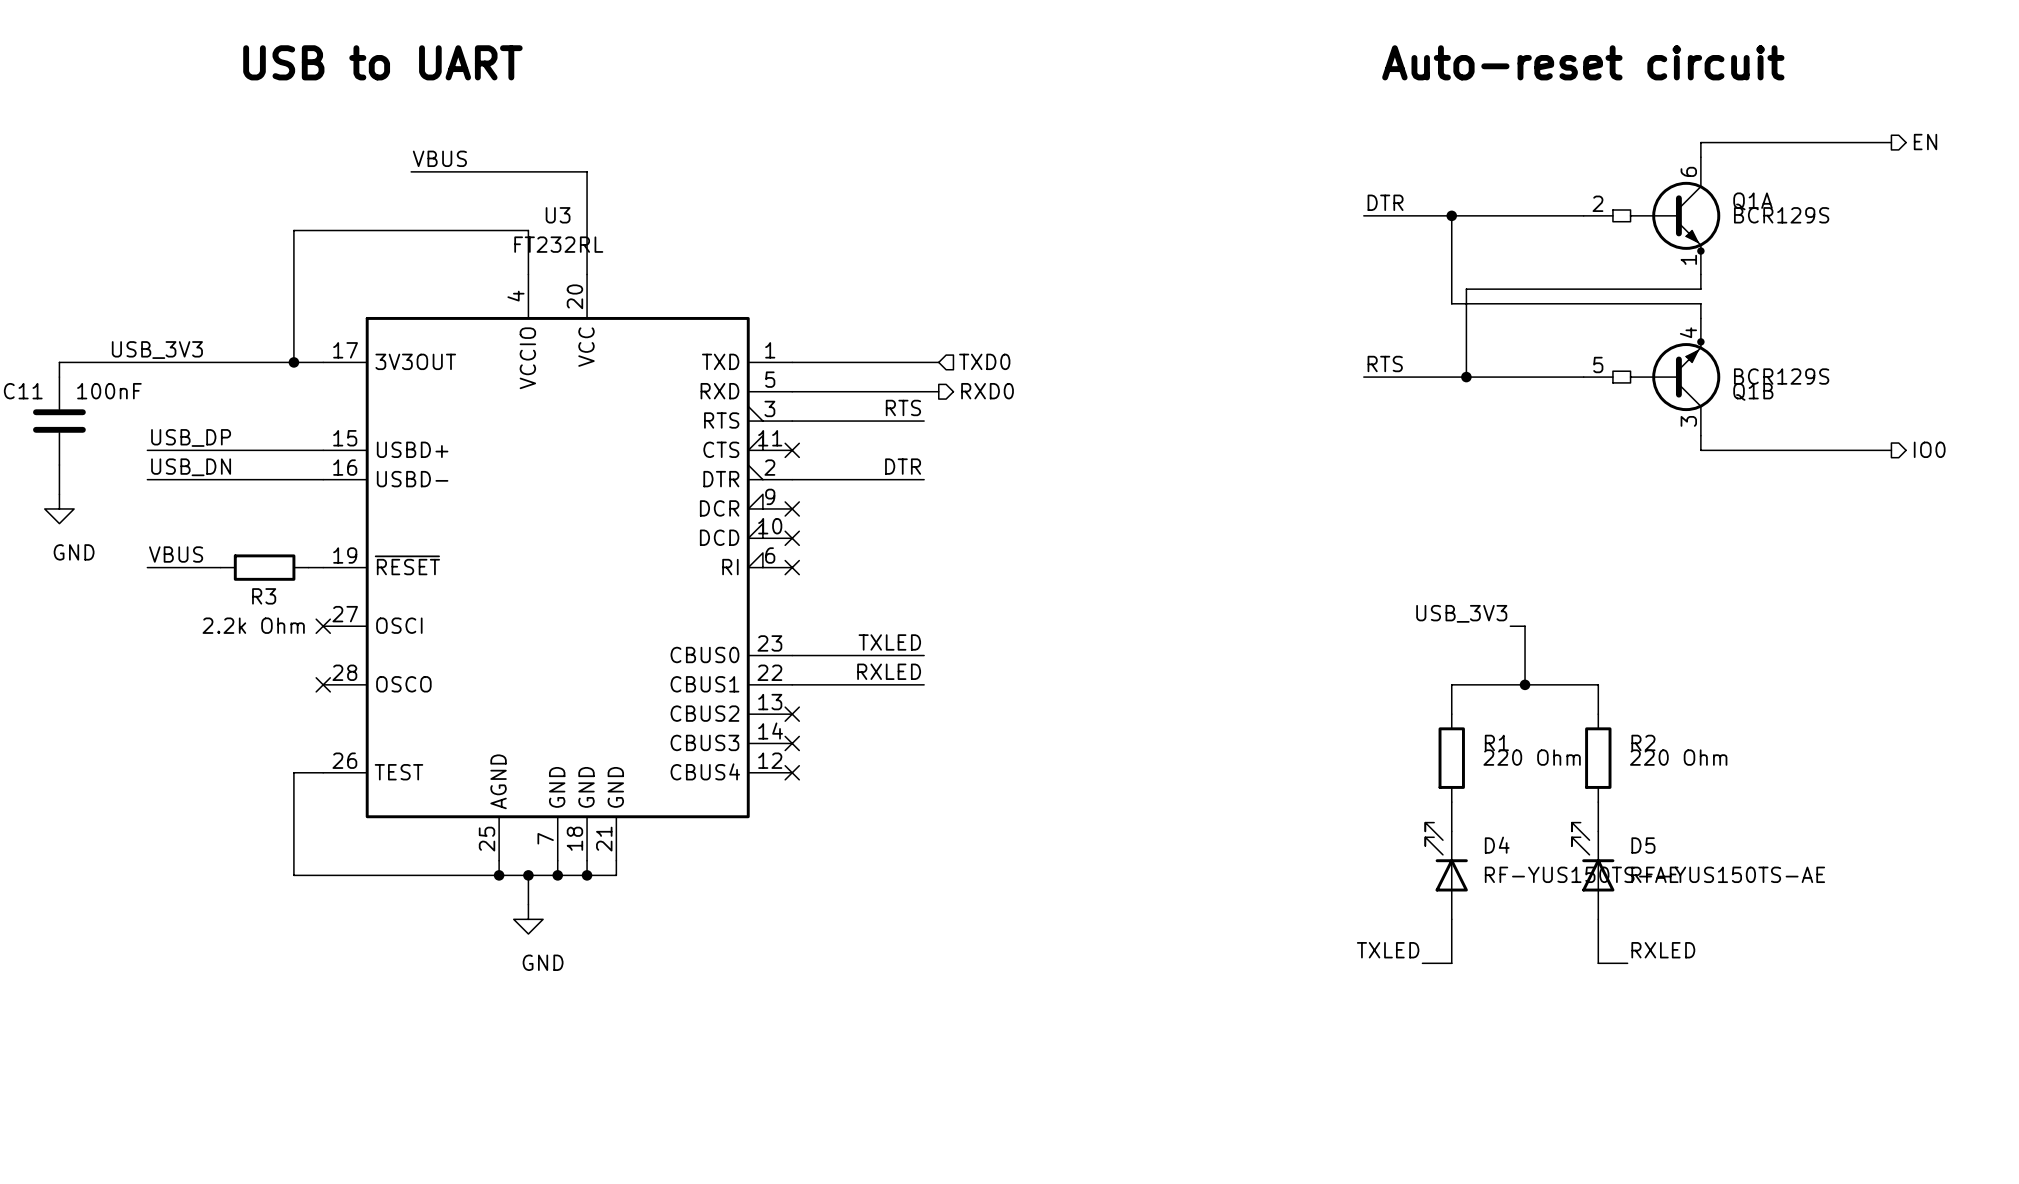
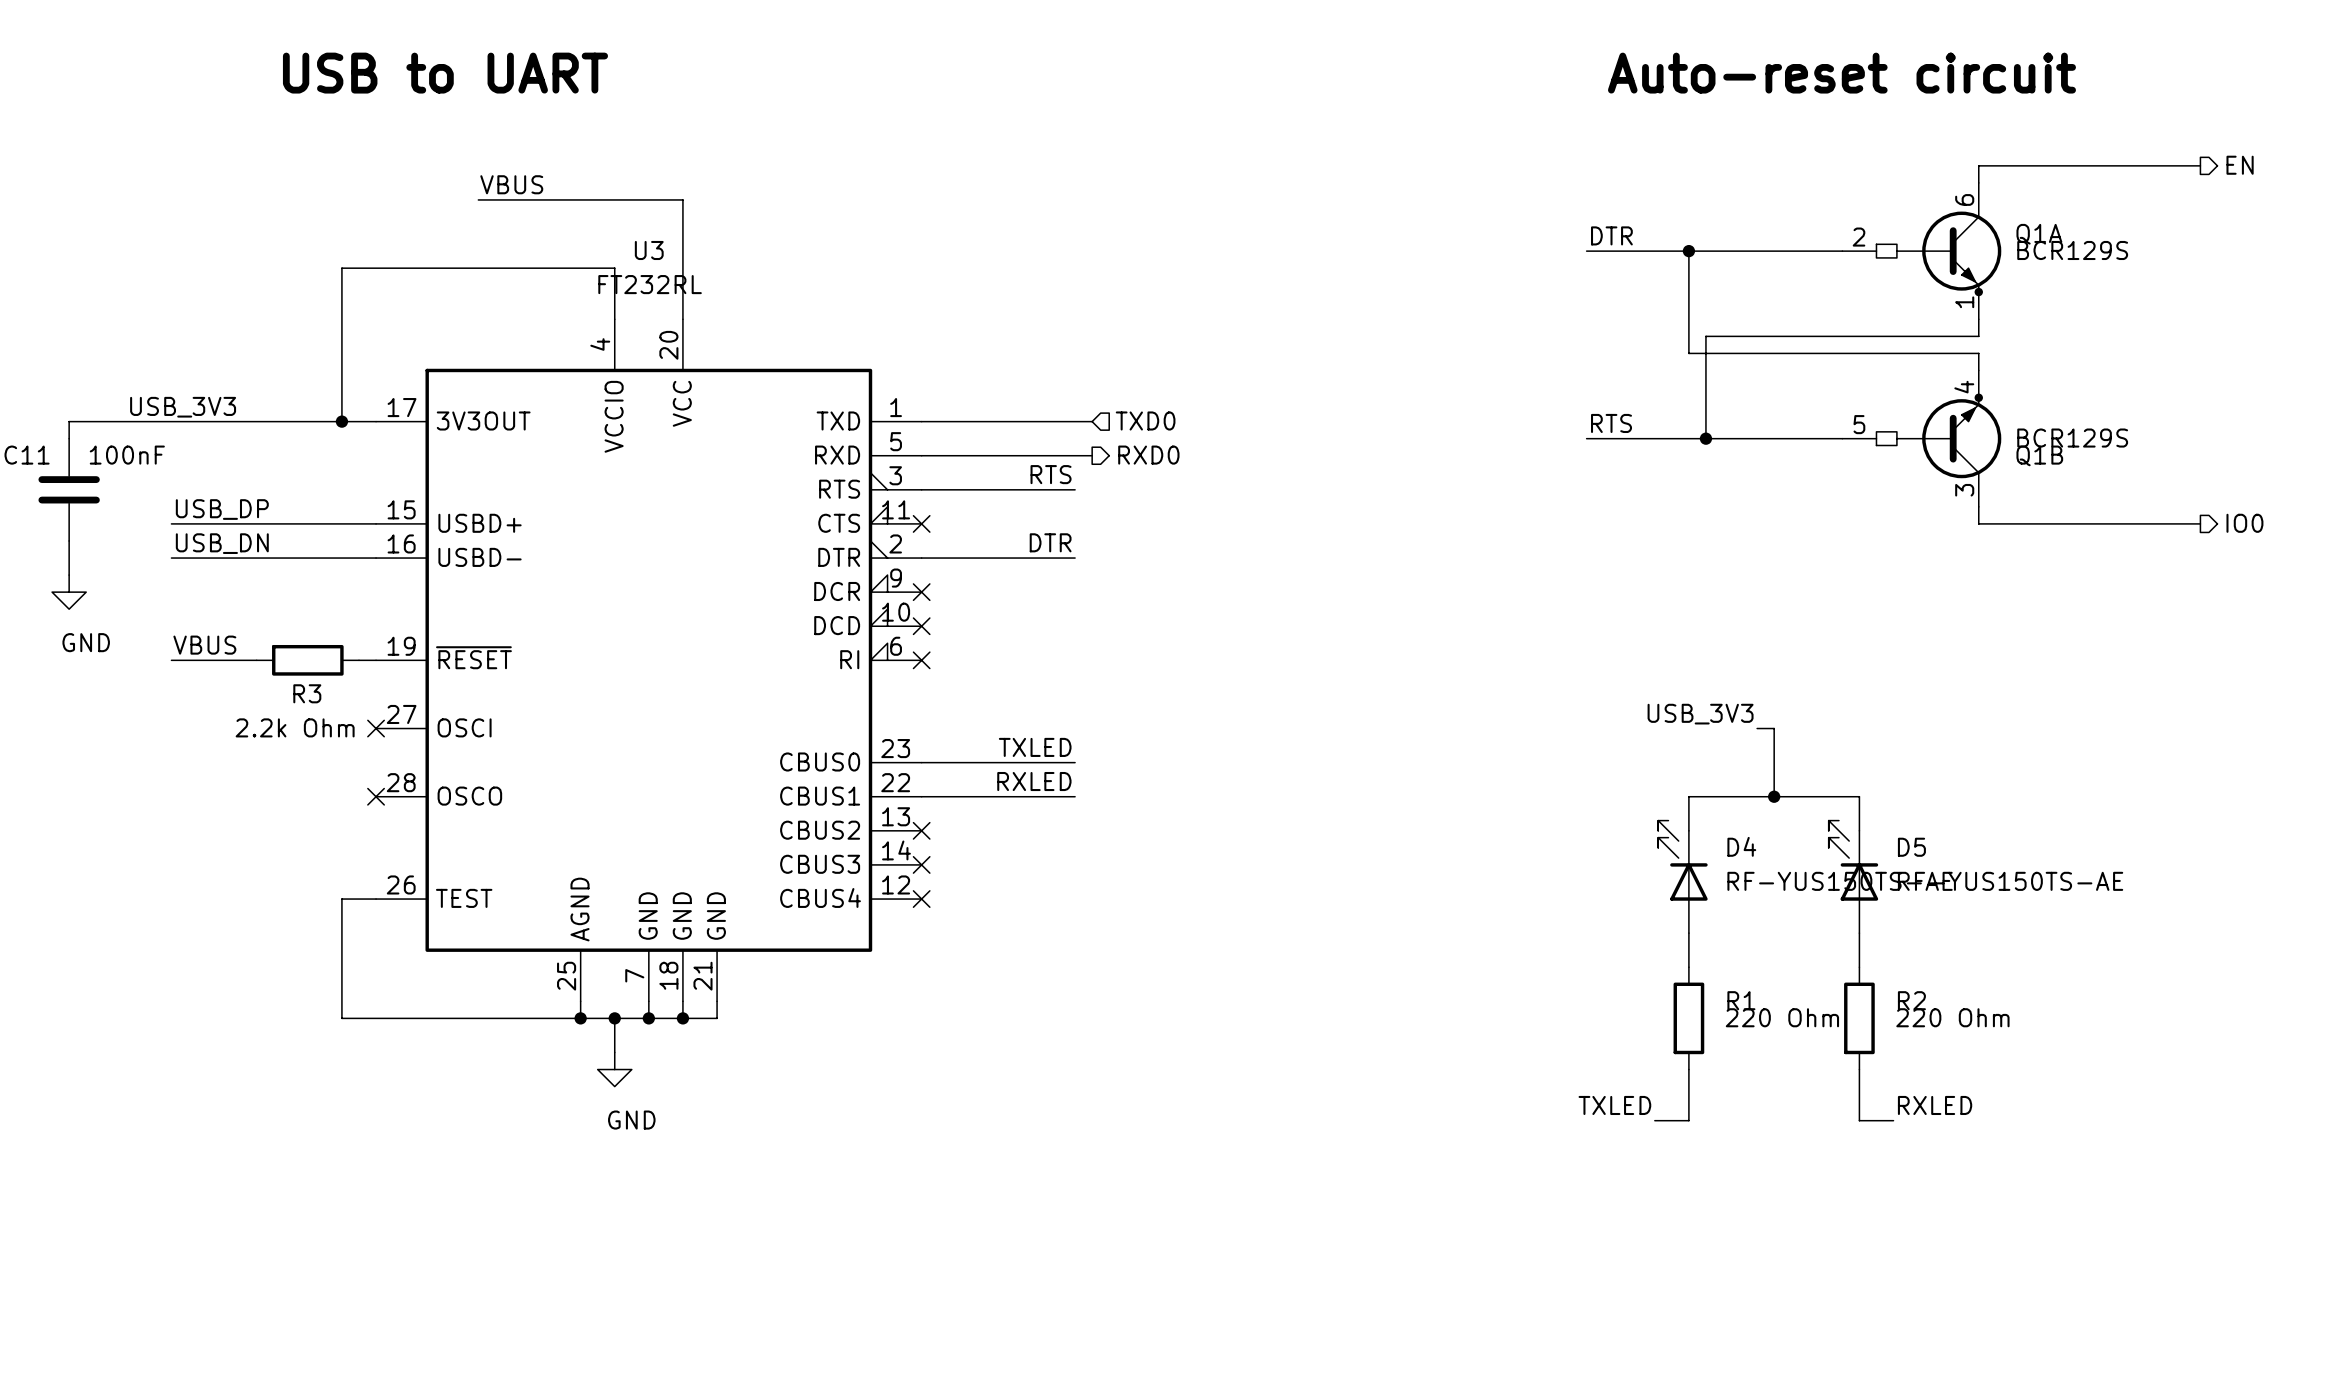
R1 position: (1451, 758) -> (1688, 1018)
R2 position: (1598, 758) -> (1859, 1018)
D4 position: (1446, 870) -> (1682, 876)
D5 position: (1593, 870) -> (1853, 876)

